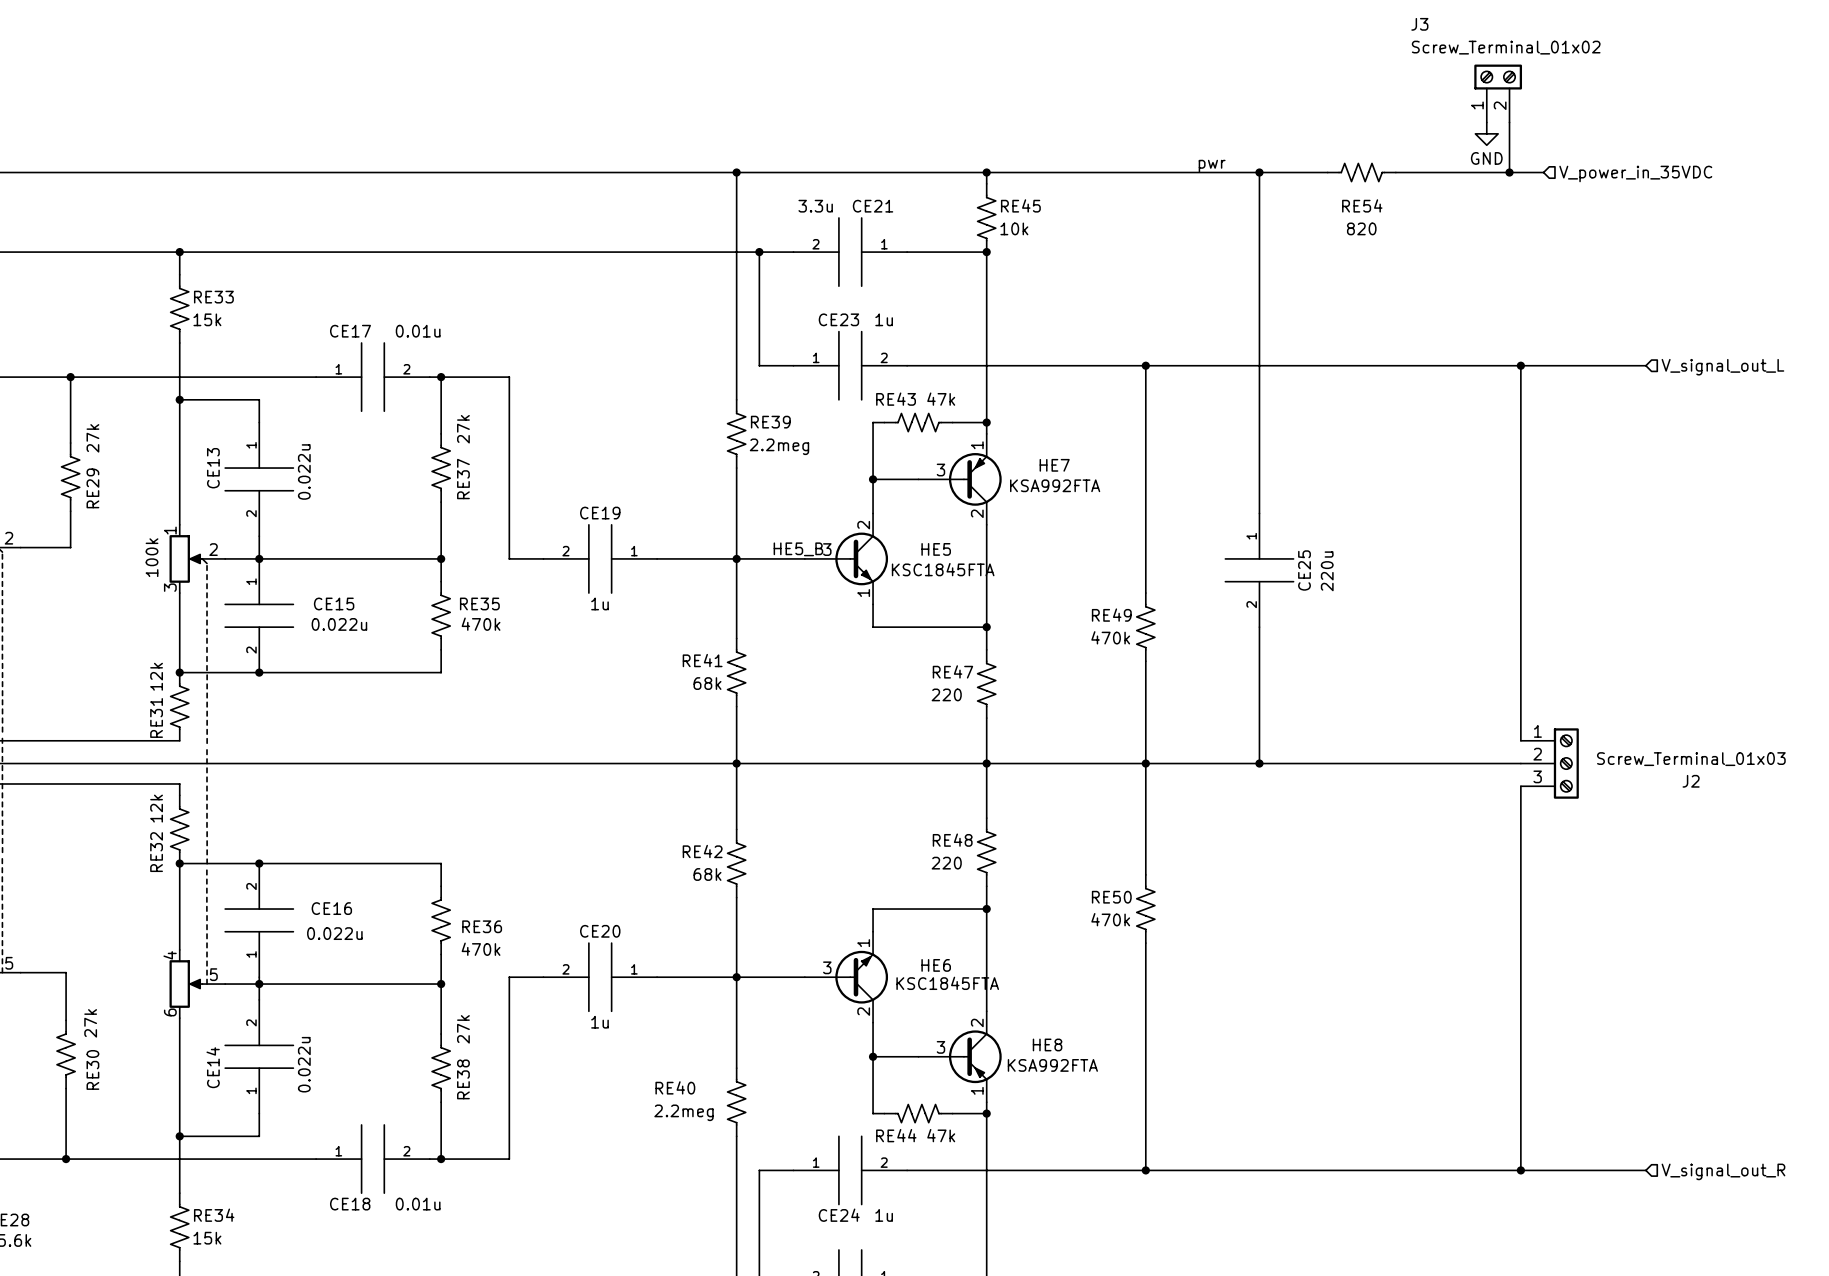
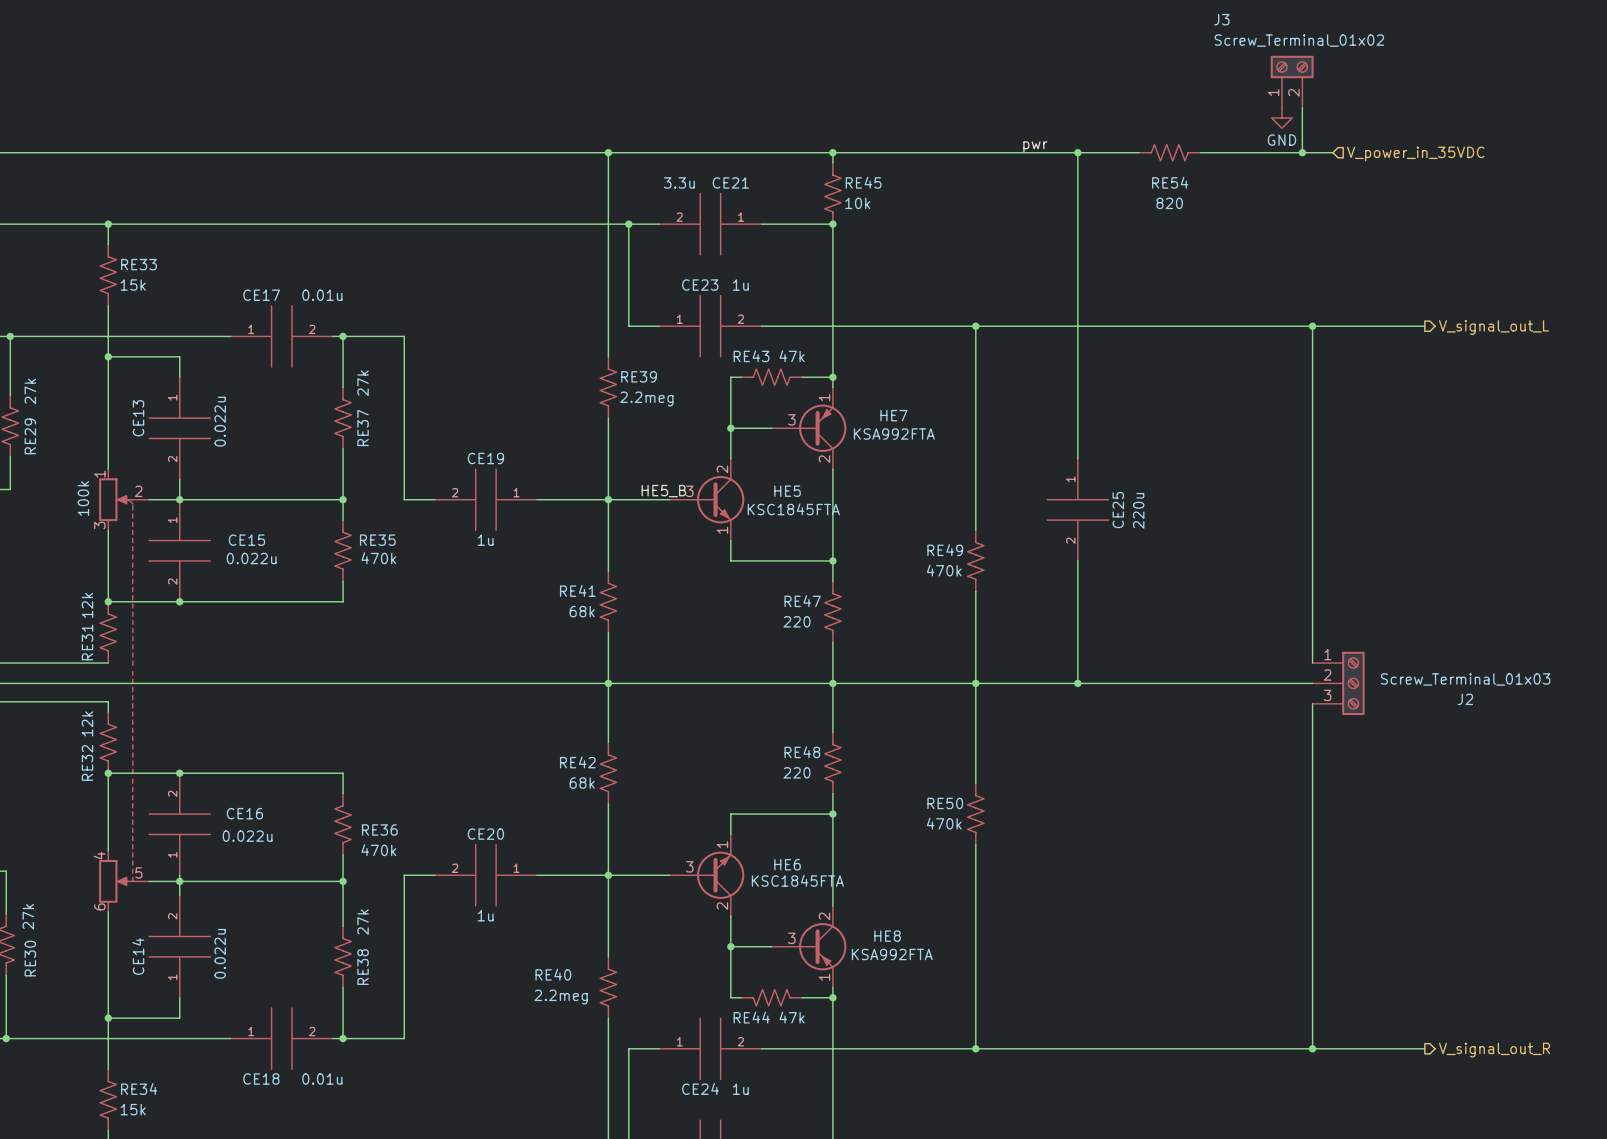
hierarchical label shape: input (1722, 367) -> output (1494, 327)
hierarchical label shape: input (1723, 1171) -> output (1494, 1050)

